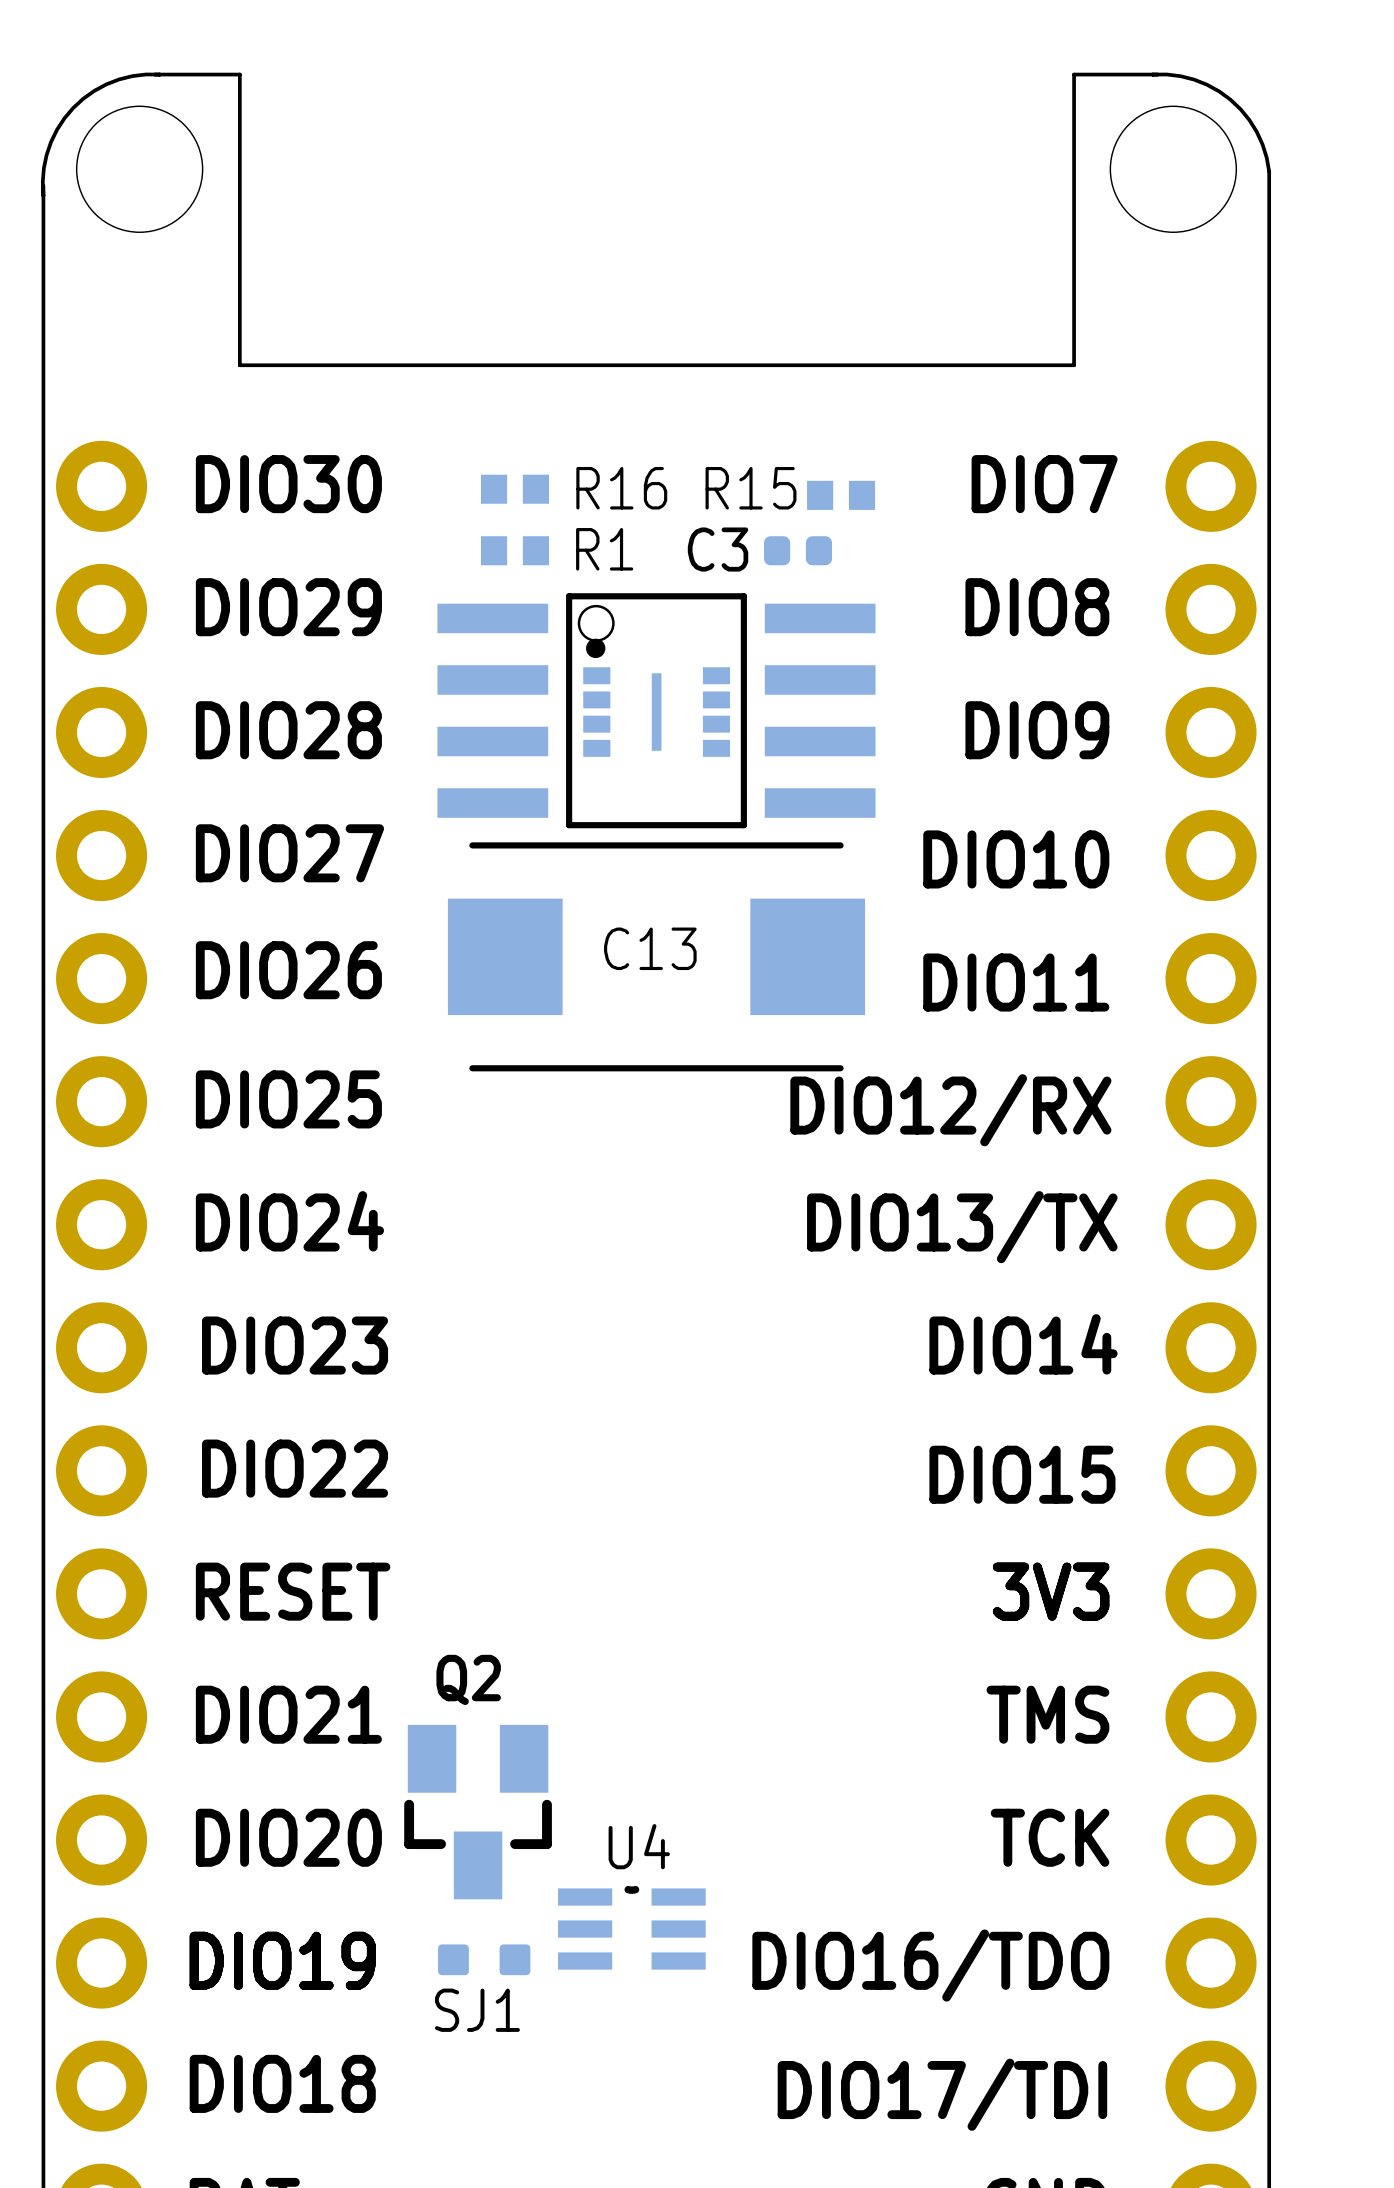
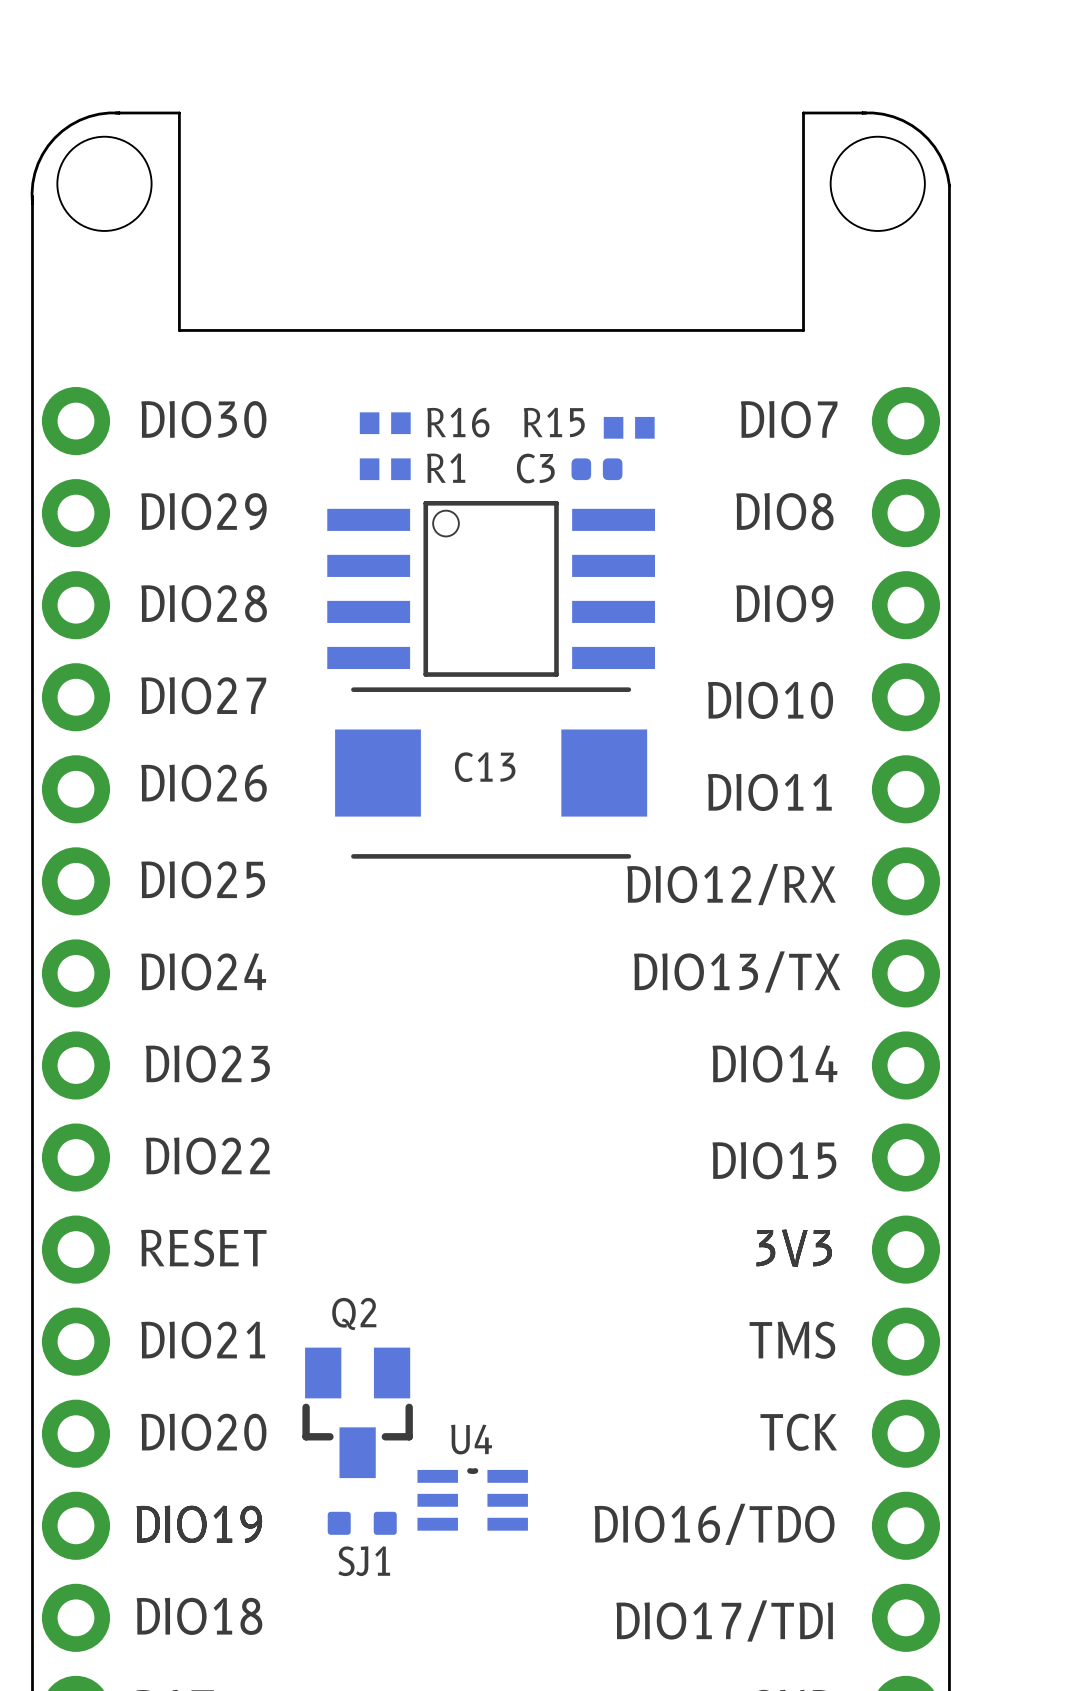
part: (656, 697) -> none

